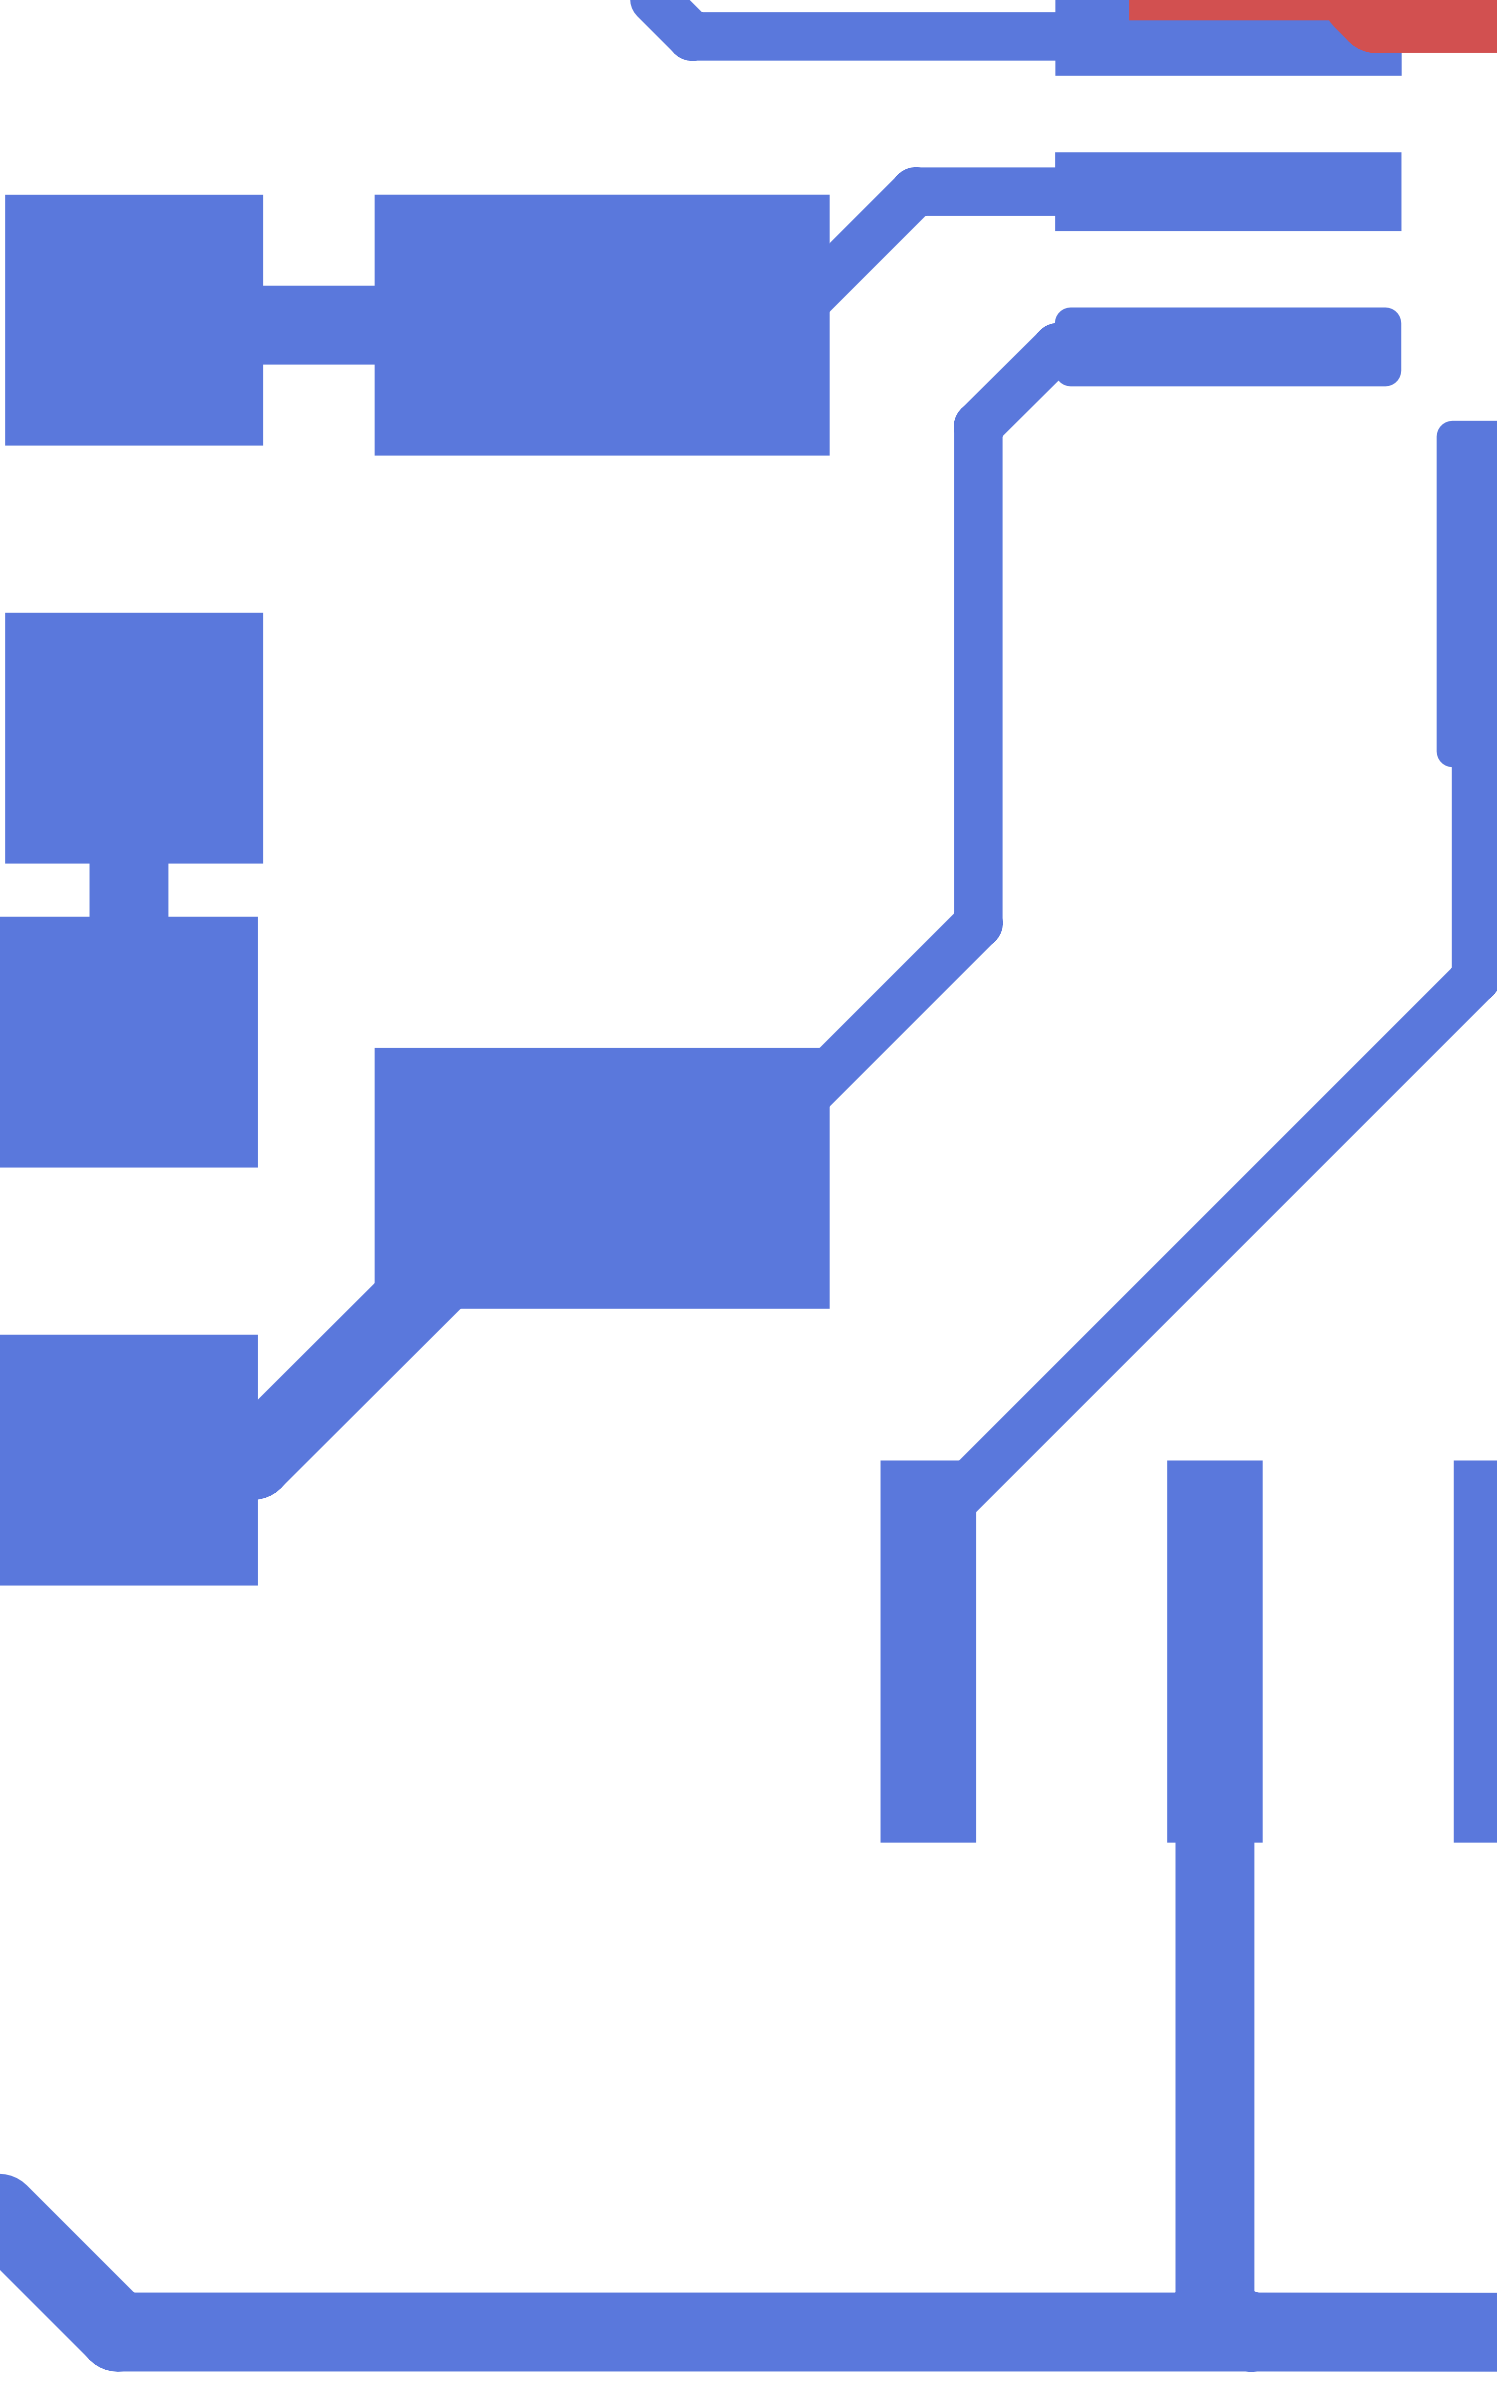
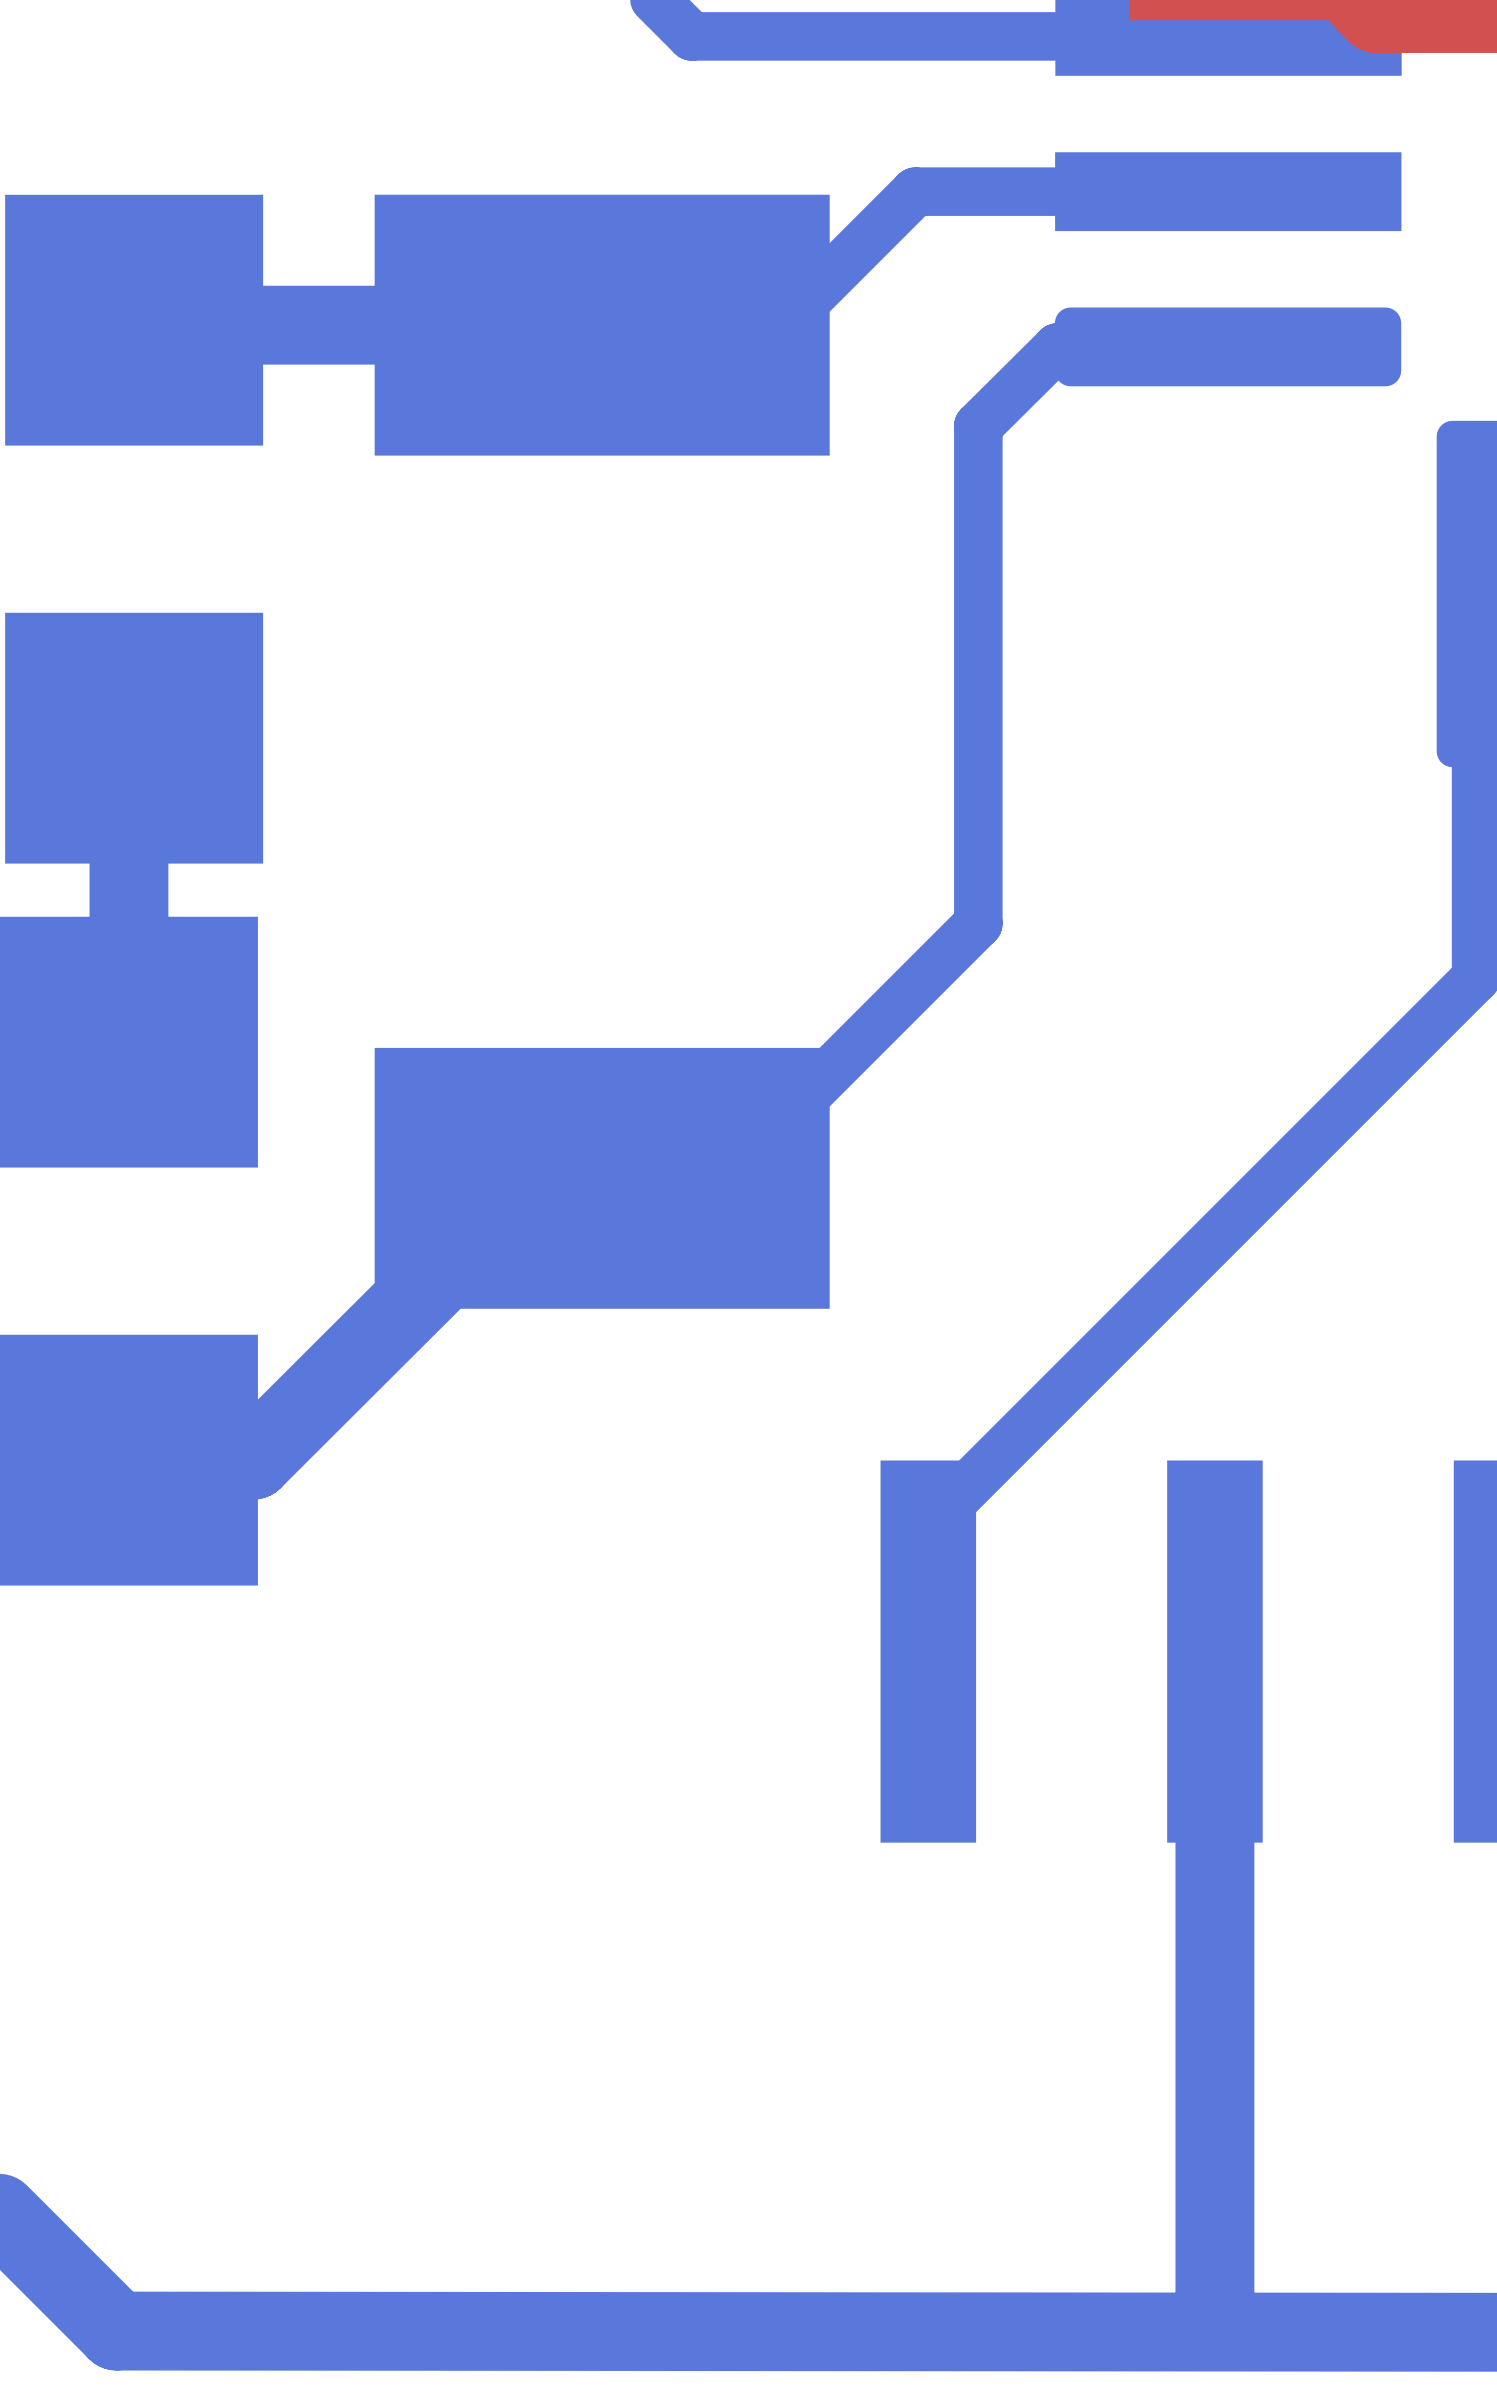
bottom track: (1214, 2319) (1251, 2332) (117, 2332) -> (1251, 2332) (116, 2331)

